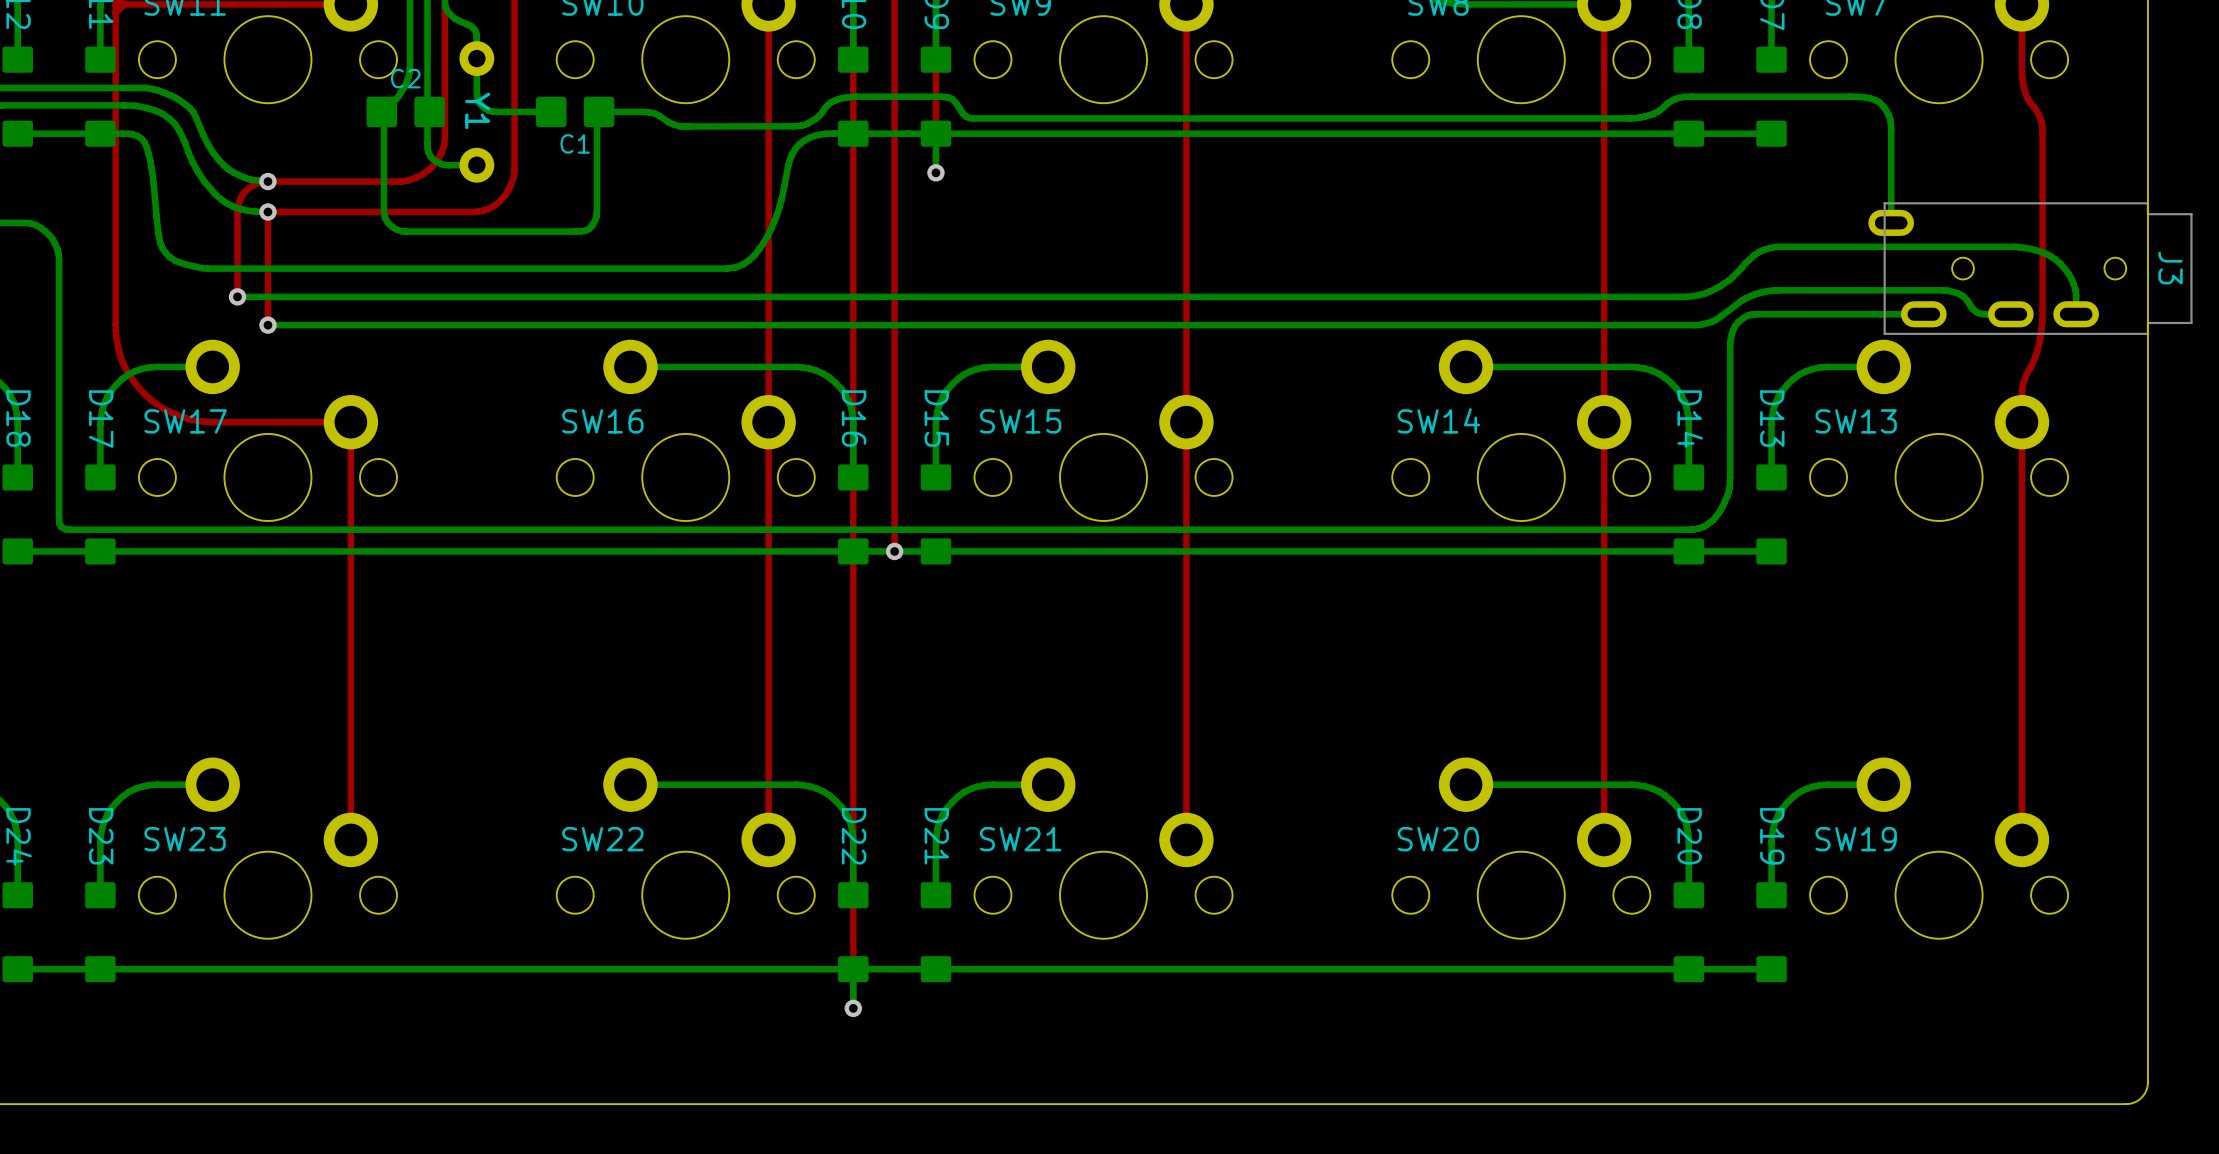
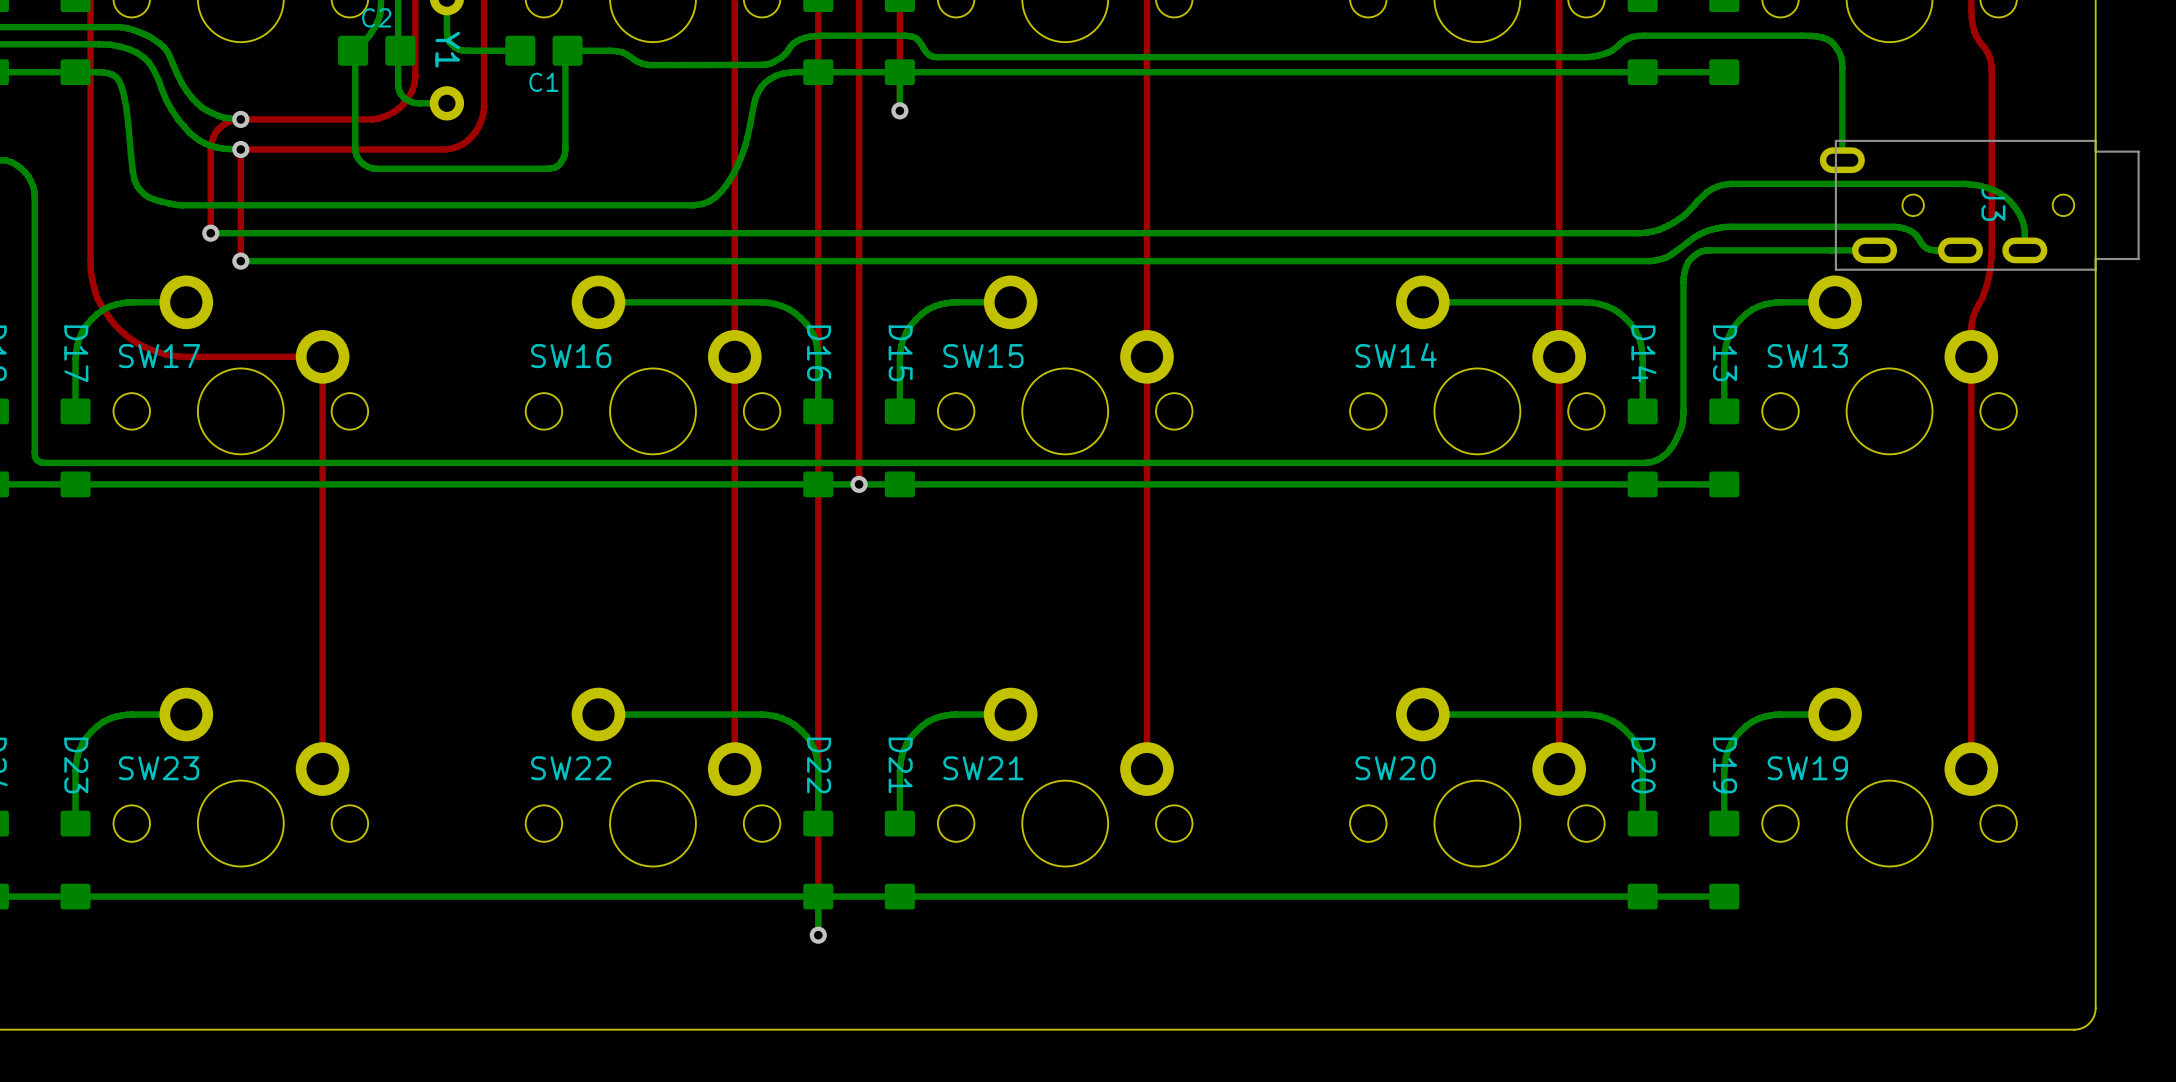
J3 name position: J3 (2170, 268) -> J3 (1993, 204)

